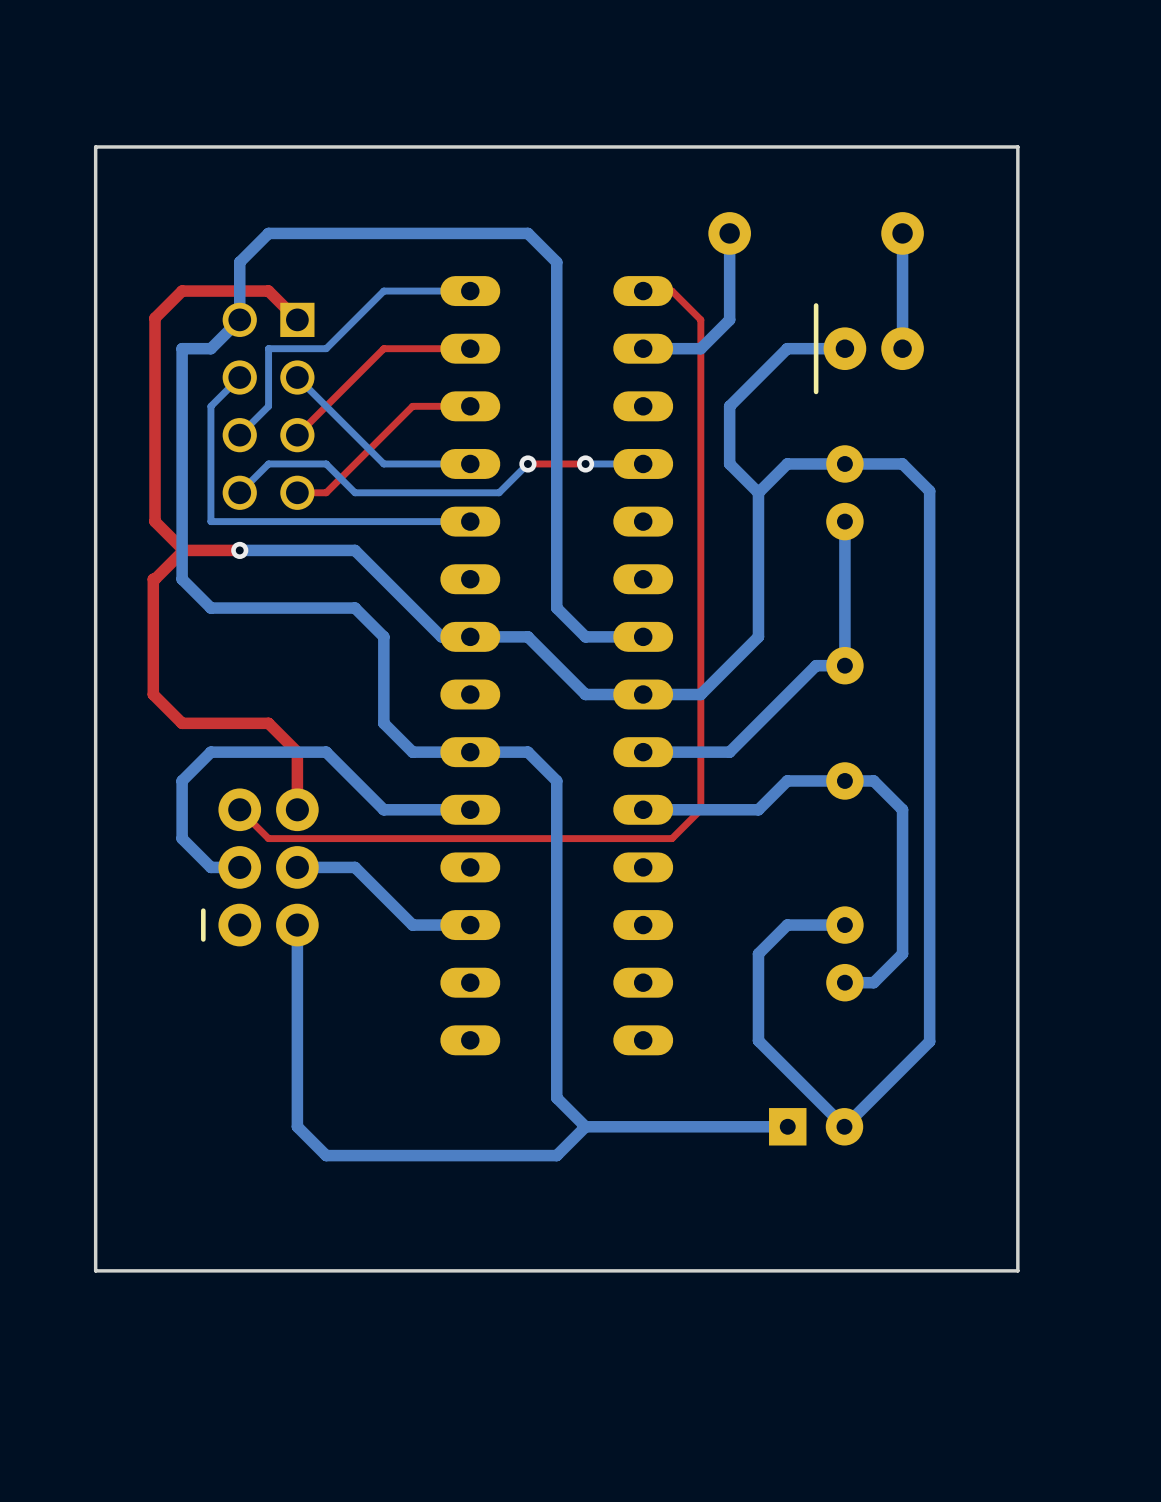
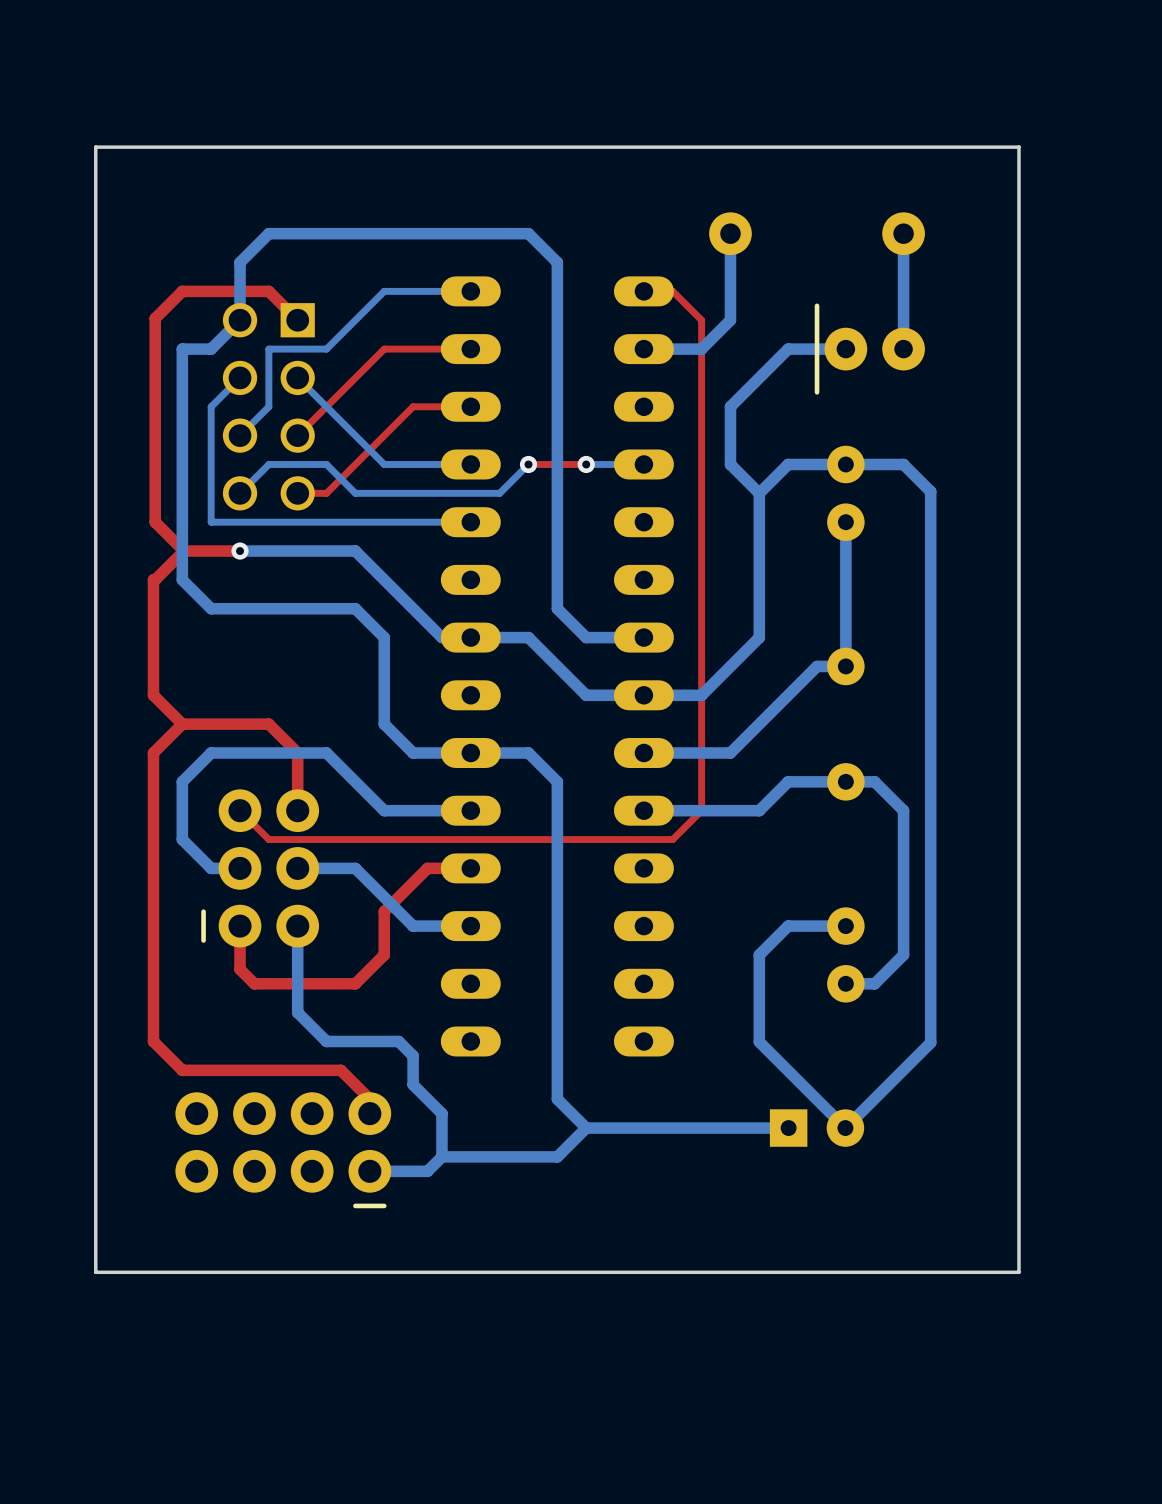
top track: none -> (182, 724) (153, 752) (153, 1041) (182, 1070) (340, 1070) (369, 1099) (369, 1113)
top track: none -> (470, 868) (427, 868) (384, 911) (384, 954) (355, 983) (254, 983) (240, 969) (240, 926)
bottom track: (297, 1011) (297, 1126) (326, 1155) (441, 1155) -> (297, 1012) (326, 1041) (398, 1041) (413, 1055) (413, 1084) (441, 1113) (441, 1156) (427, 1171) (369, 1171)
part: none -> (283, 1150)

